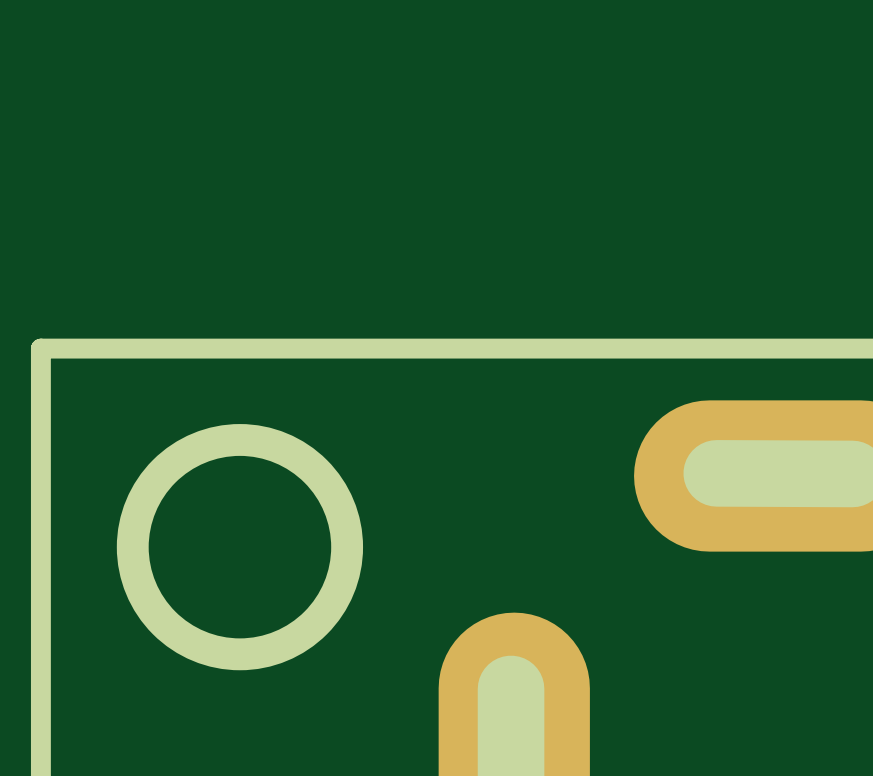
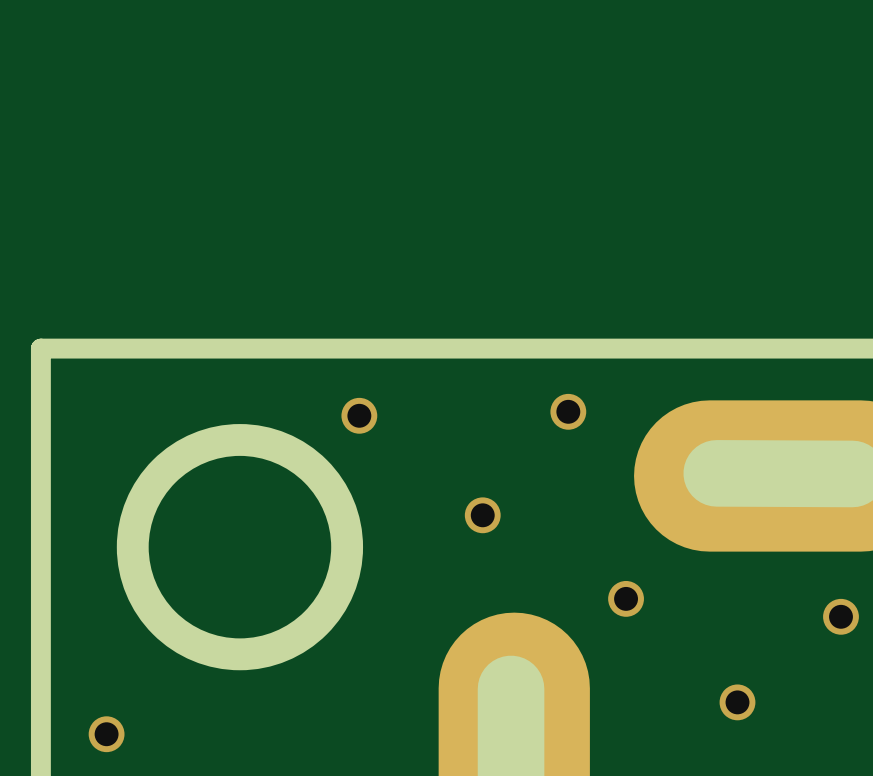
via: none -> (568, 411)
via: none -> (359, 415)
via: none -> (482, 515)
via: none -> (626, 598)
via: none -> (840, 616)
via: none -> (737, 702)
via: none -> (106, 734)

